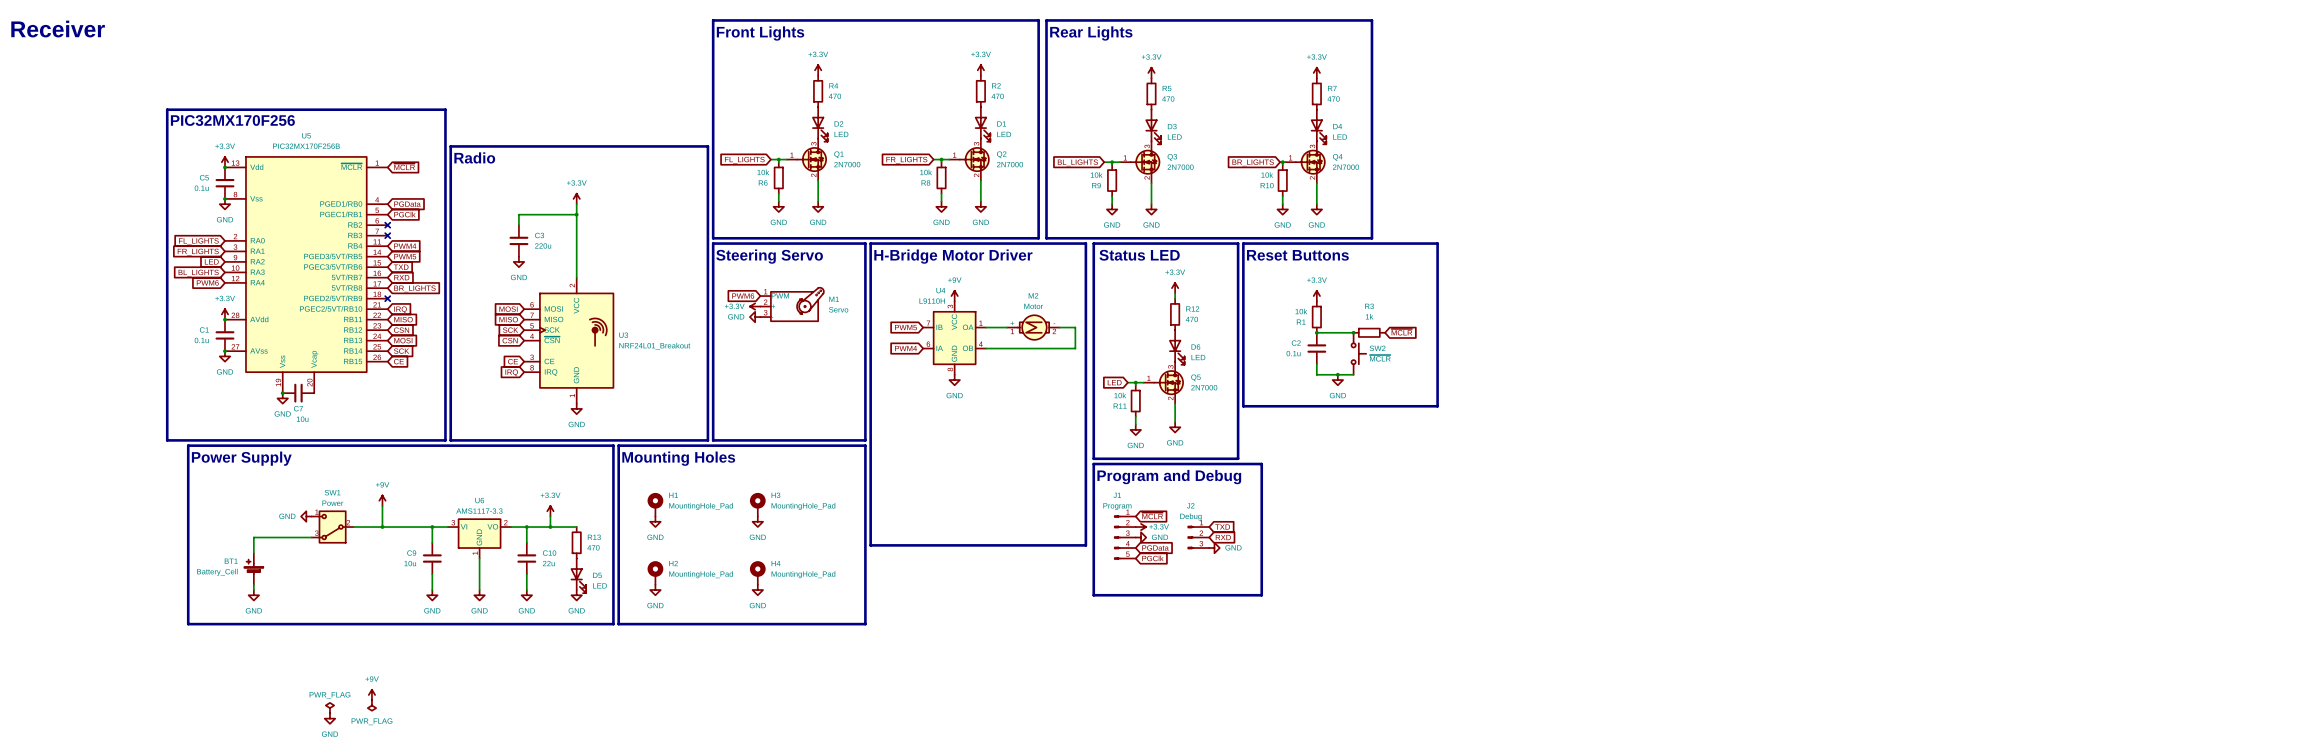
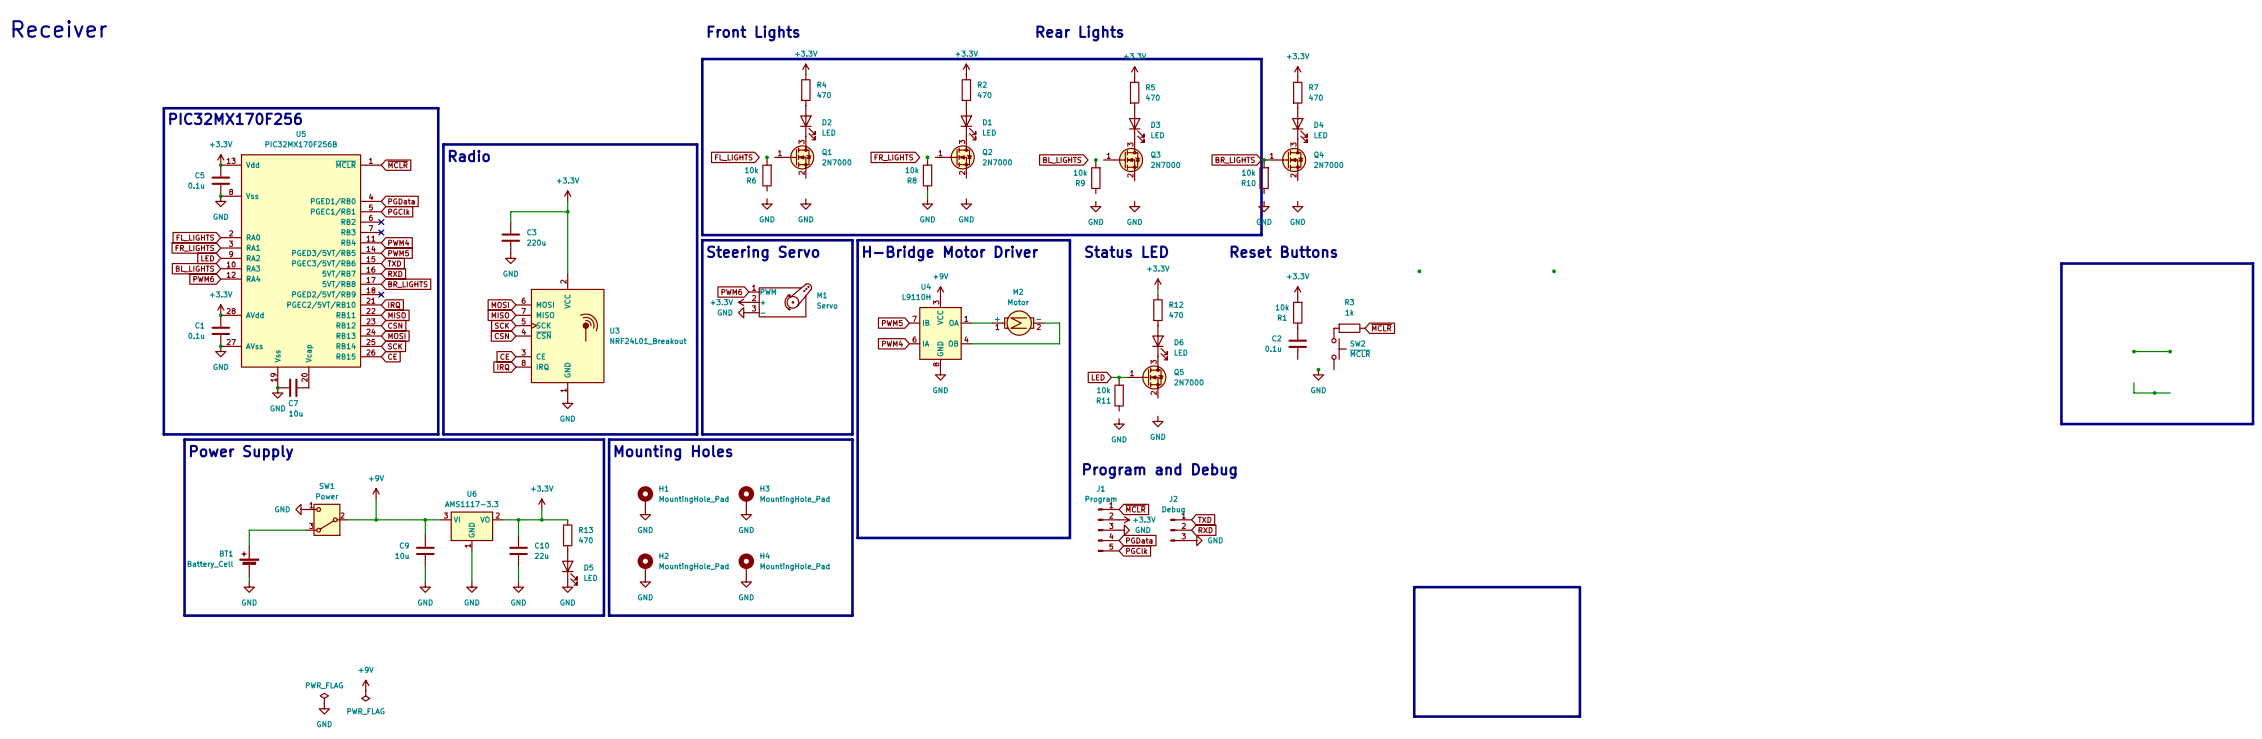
line: (713, 59) (713, 20) (1038, 20) (1038, 238) -> (702, 59) (1261, 59) (1261, 235)
wire: (770, 159) (786, 159) -> none
wire: (933, 159) (949, 159) -> none
wire: (1104, 162) (1119, 162) -> none
wire: (818, 180) (818, 201) -> none
wire: (980, 180) (980, 201) -> none
wire: (1151, 183) (1151, 204) -> none
wire: (1316, 183) (1316, 204) -> none
wire: (778, 193) (778, 201) -> none
wire: (1112, 196) (1112, 204) -> none
wire: (1282, 196) (1282, 204) -> none
line: (1046, 238) (1046, 20) (1371, 20) (1371, 238) (1280, 238) -> (1031, 235) (1023, 235)
line: (1093, 243) (1238, 243) (1238, 458) (1093, 458) (1093, 243) -> none
line: (1243, 243) (1437, 243) (1437, 406) (1243, 406) (1243, 243) -> none
line: none -> (2061, 263) (2253, 263) (2253, 424) (2061, 424) (2061, 263)
junction: none -> (1419, 271)
junction: none -> (1554, 271)
wire: (1316, 332) (1353, 332) -> none
junction: (1316, 332) -> none
junction: (1353, 332) -> none
wire: none -> (2133, 351) (2170, 351)
junction: none -> (2133, 351)
junction: none -> (2170, 351)
wire: (1316, 364) (1316, 374) (1353, 374) -> none
wire: none -> (2133, 382) (2133, 392) (2170, 392)
junction: none -> (2154, 392)
wire: (1175, 403) (1175, 422) -> none
wire: (1135, 416) (1135, 424) -> none
line: (1093, 464) (1261, 464) (1261, 595) (1093, 595) (1093, 464) -> none
line: none -> (1414, 587) (1579, 587) (1579, 716) (1414, 716) (1414, 587)

